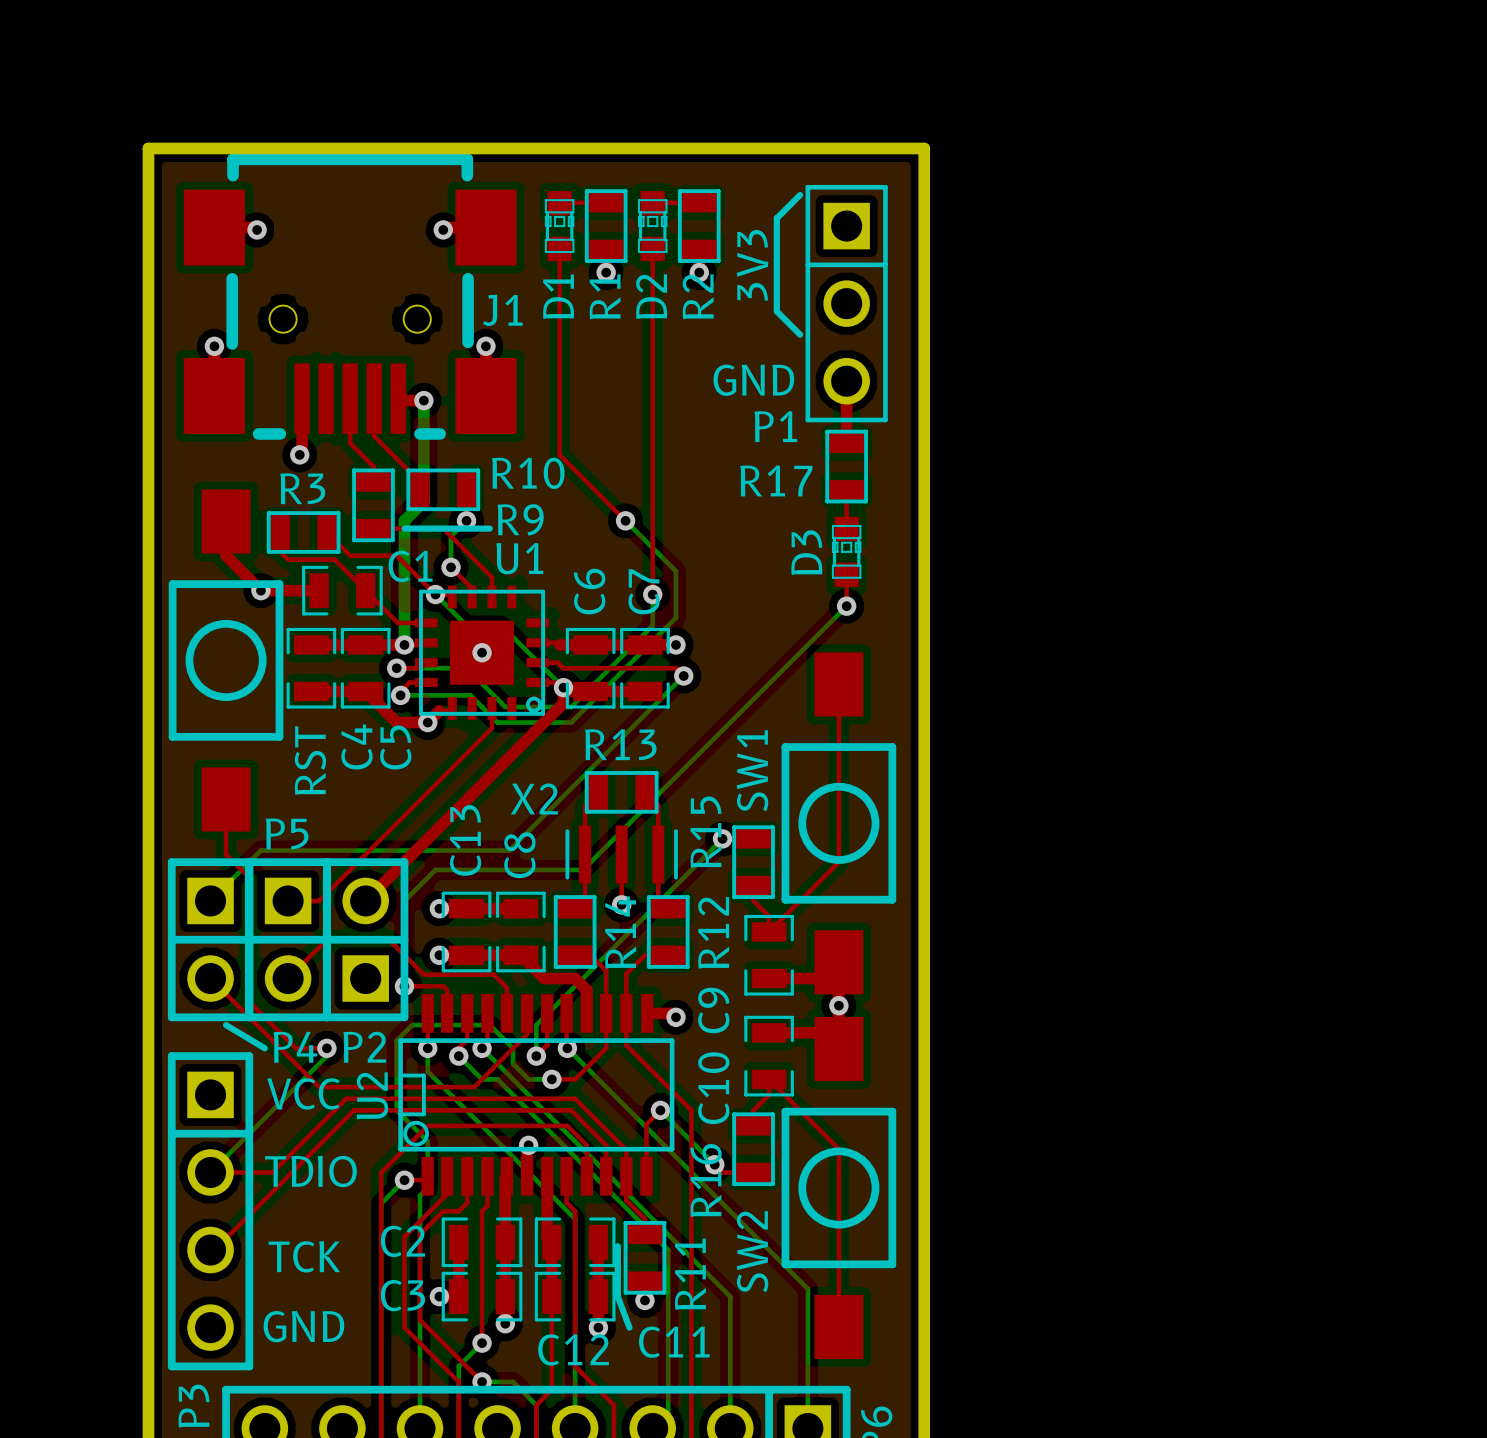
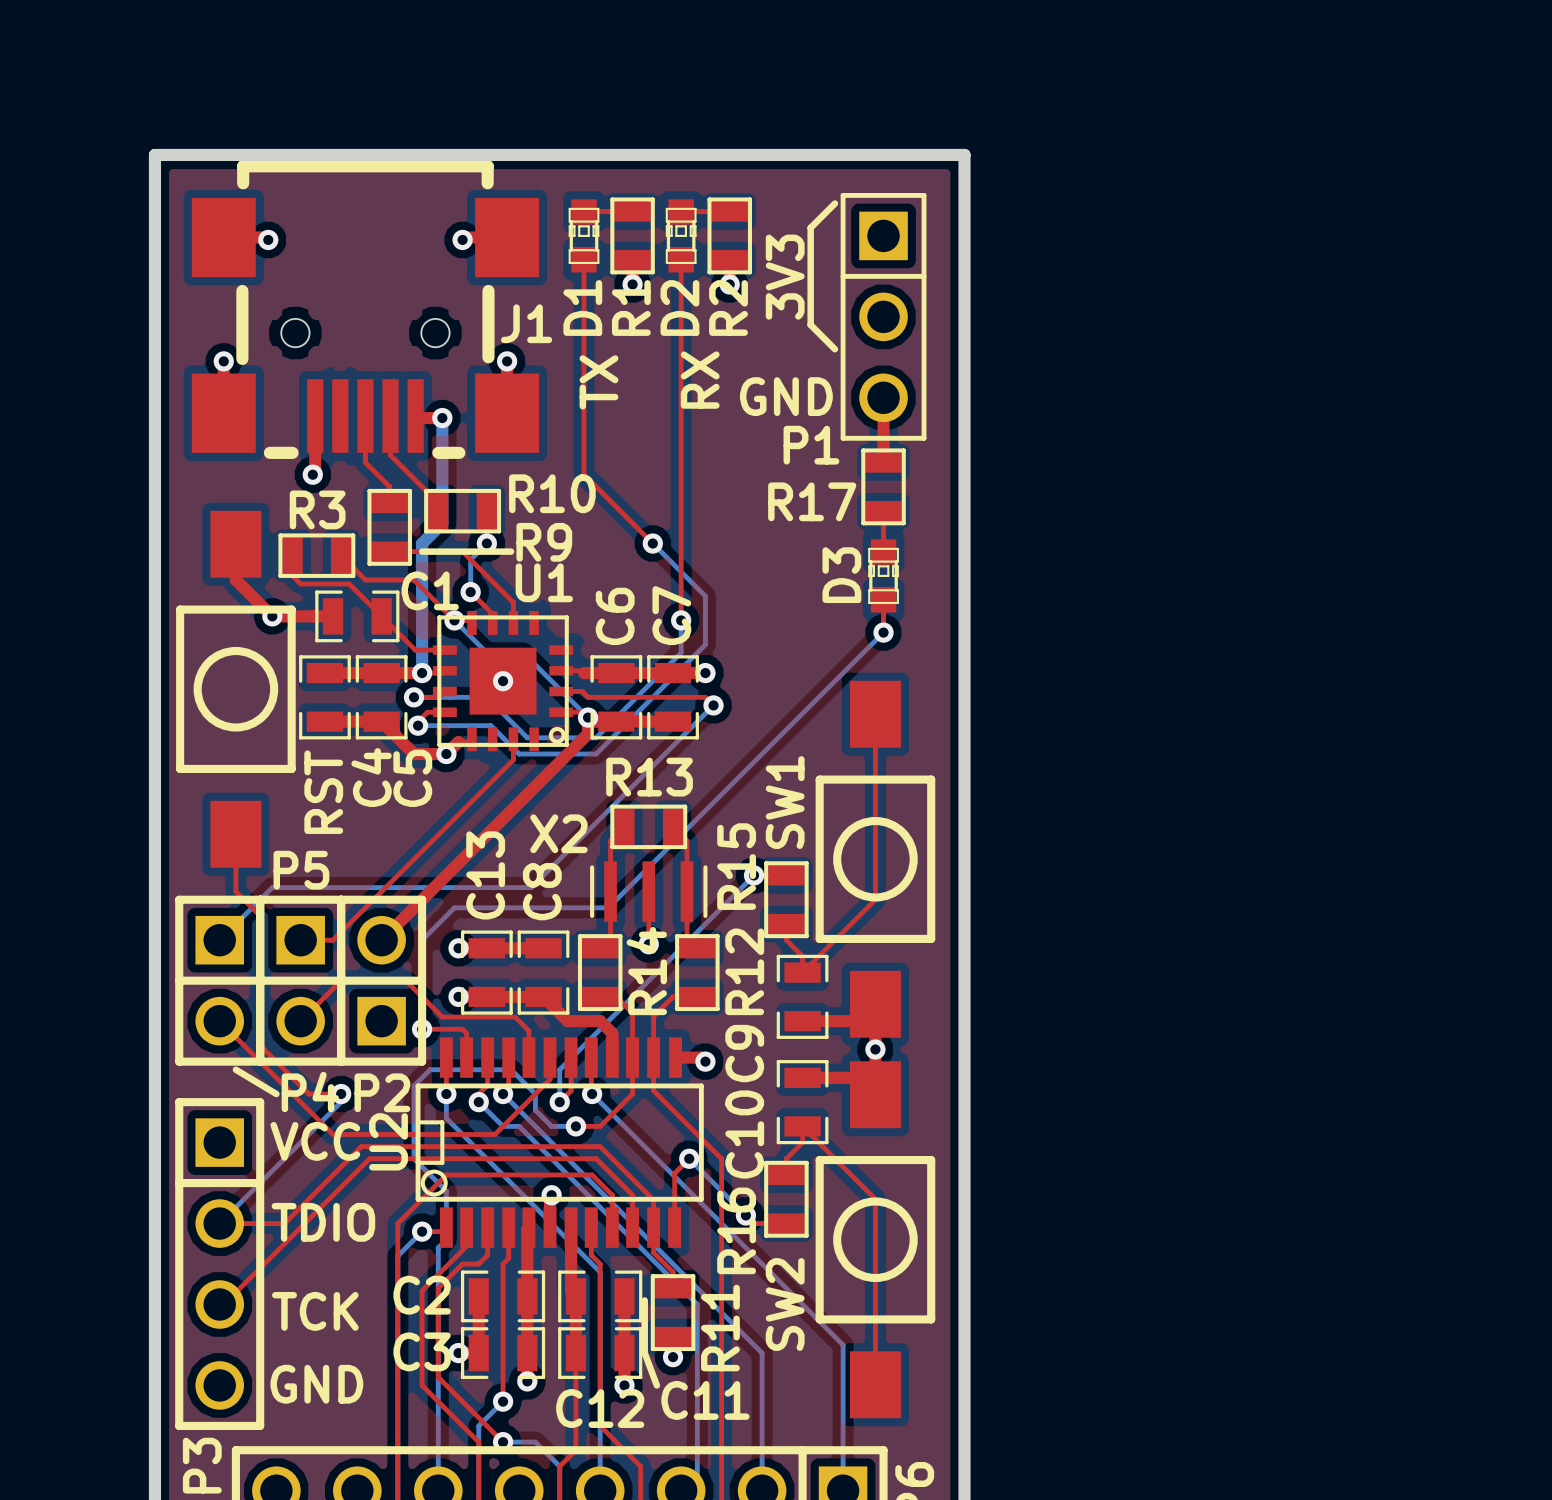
text: none -> RX (700, 380)
text: none -> TX (598, 382)

